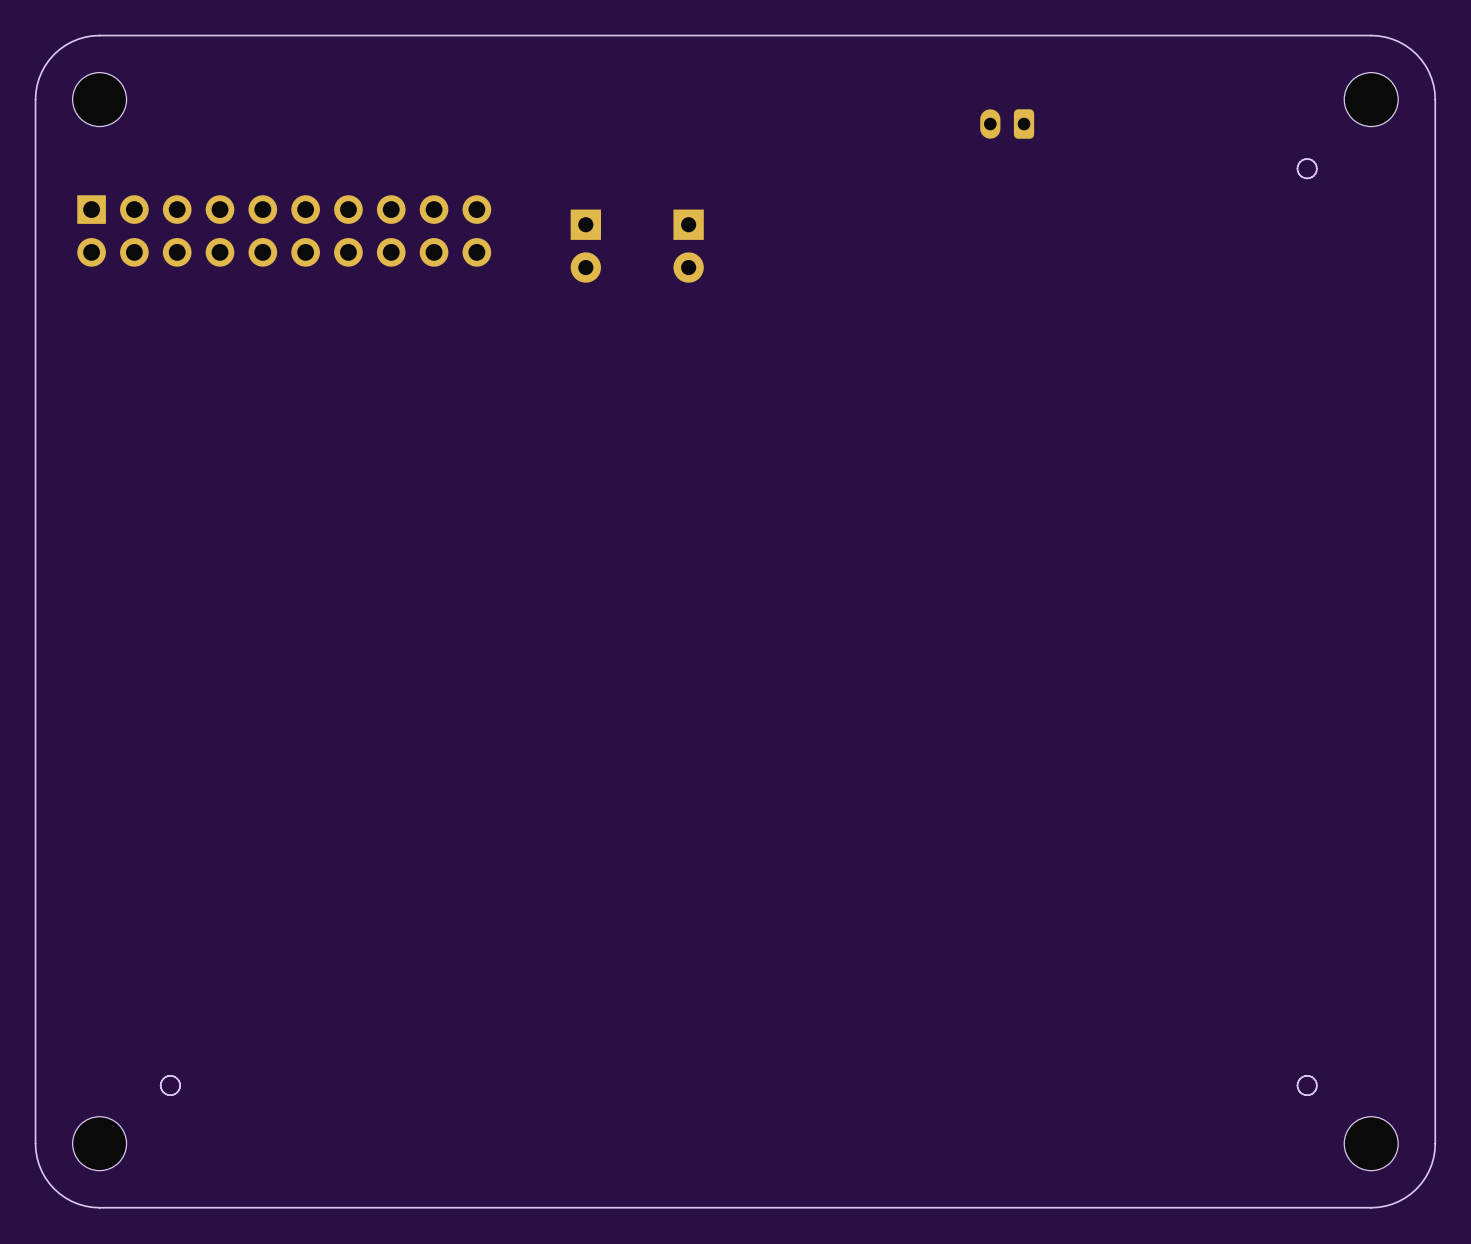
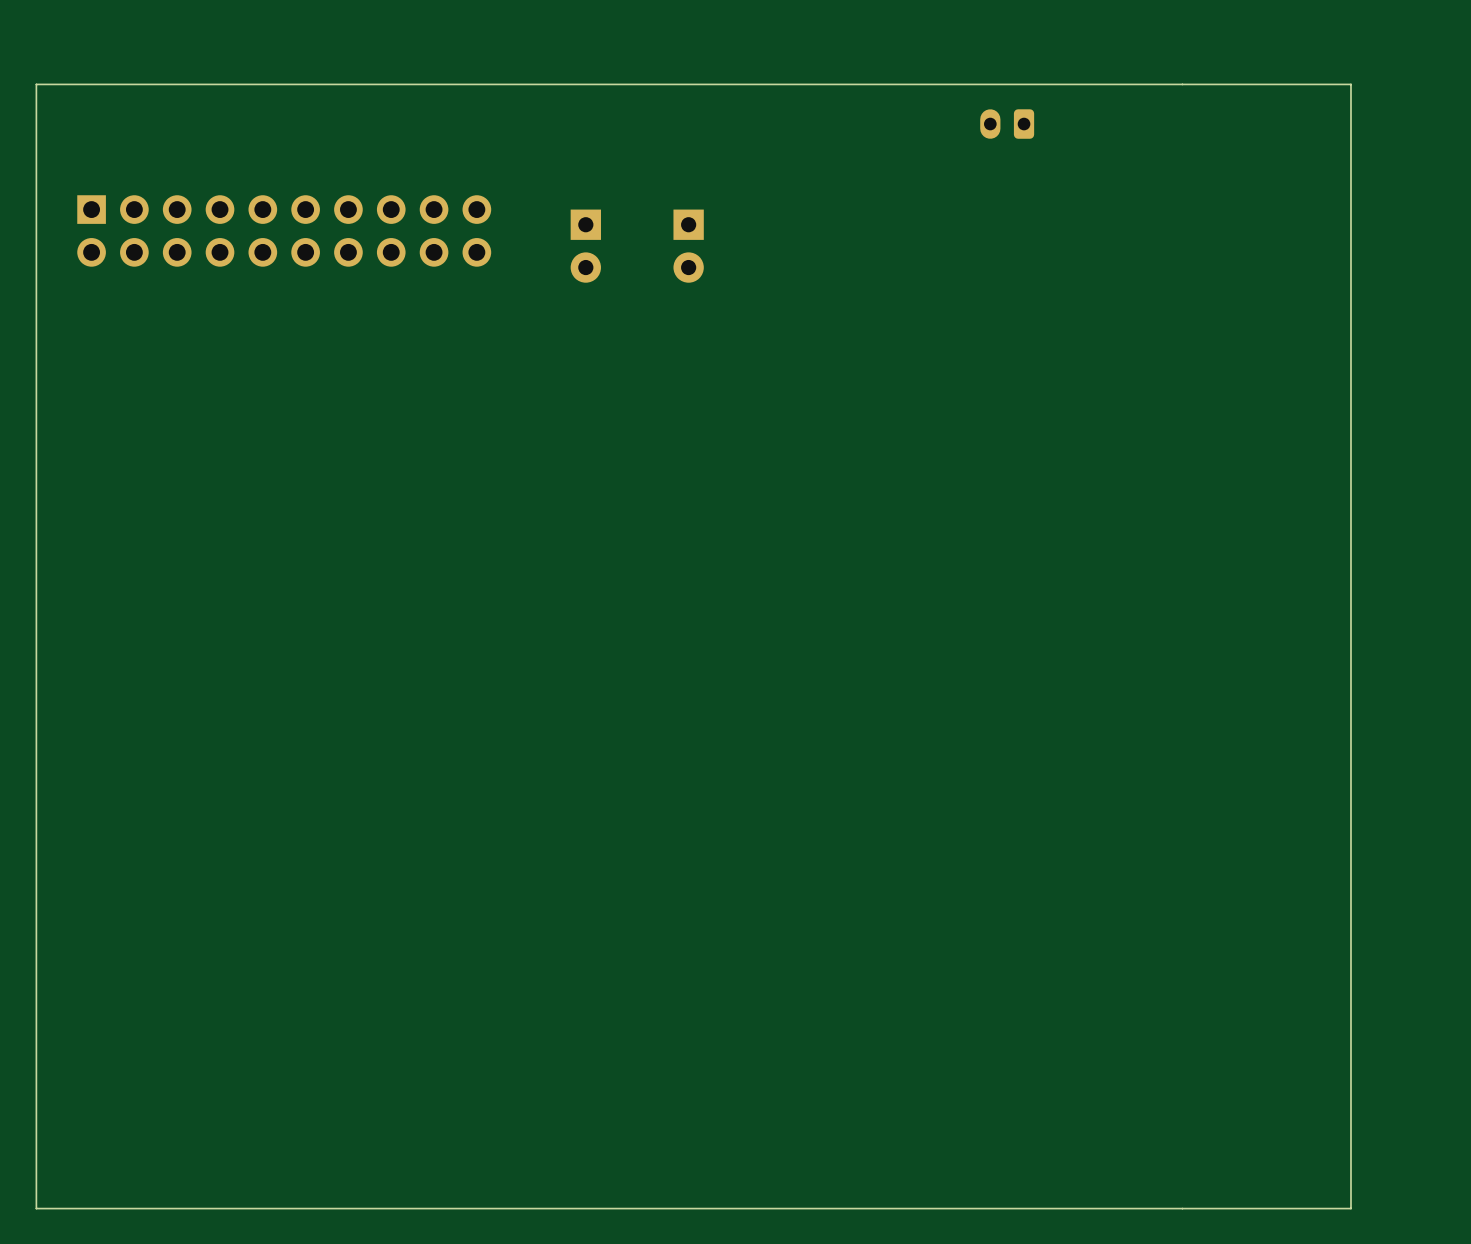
board edge: (1371, 35) (99, 35) (78, 39) (59, 49) (49, 59) (41, 71) (37, 85) (35, 99) (35, 1143) (39, 1164) (49, 1183) (59, 1193) (71, 1201) (85, 1206) (99, 1207) (1371, 1207) (1392, 1204) (1411, 1193) (1421, 1183) (1428, 1171) (1433, 1157) (1435, 1143) (1435, 99) (1431, 78) (1425, 65) (1416, 54) (1405, 45) (1392, 39) (1371, 35) -> (1350, 84) (1350, 1208) (36, 1208) (36, 84) (1350, 84)
part: (99, 99) -> none
part: (1371, 99) -> none
board edge: (1307, 158) (1300, 161) (1297, 168) (1300, 175) (1307, 178) (1314, 175) (1316, 168) (1314, 161) (1307, 158) -> none
board edge: (170, 1075) (163, 1078) (160, 1085) (163, 1092) (170, 1095) (177, 1092) (180, 1085) (177, 1078) (170, 1075) -> none
board edge: (1307, 1075) (1300, 1078) (1297, 1085) (1300, 1092) (1307, 1095) (1314, 1092) (1316, 1085) (1314, 1078) (1307, 1075) -> none
part: (99, 1143) -> none
part: (1371, 1143) -> none

